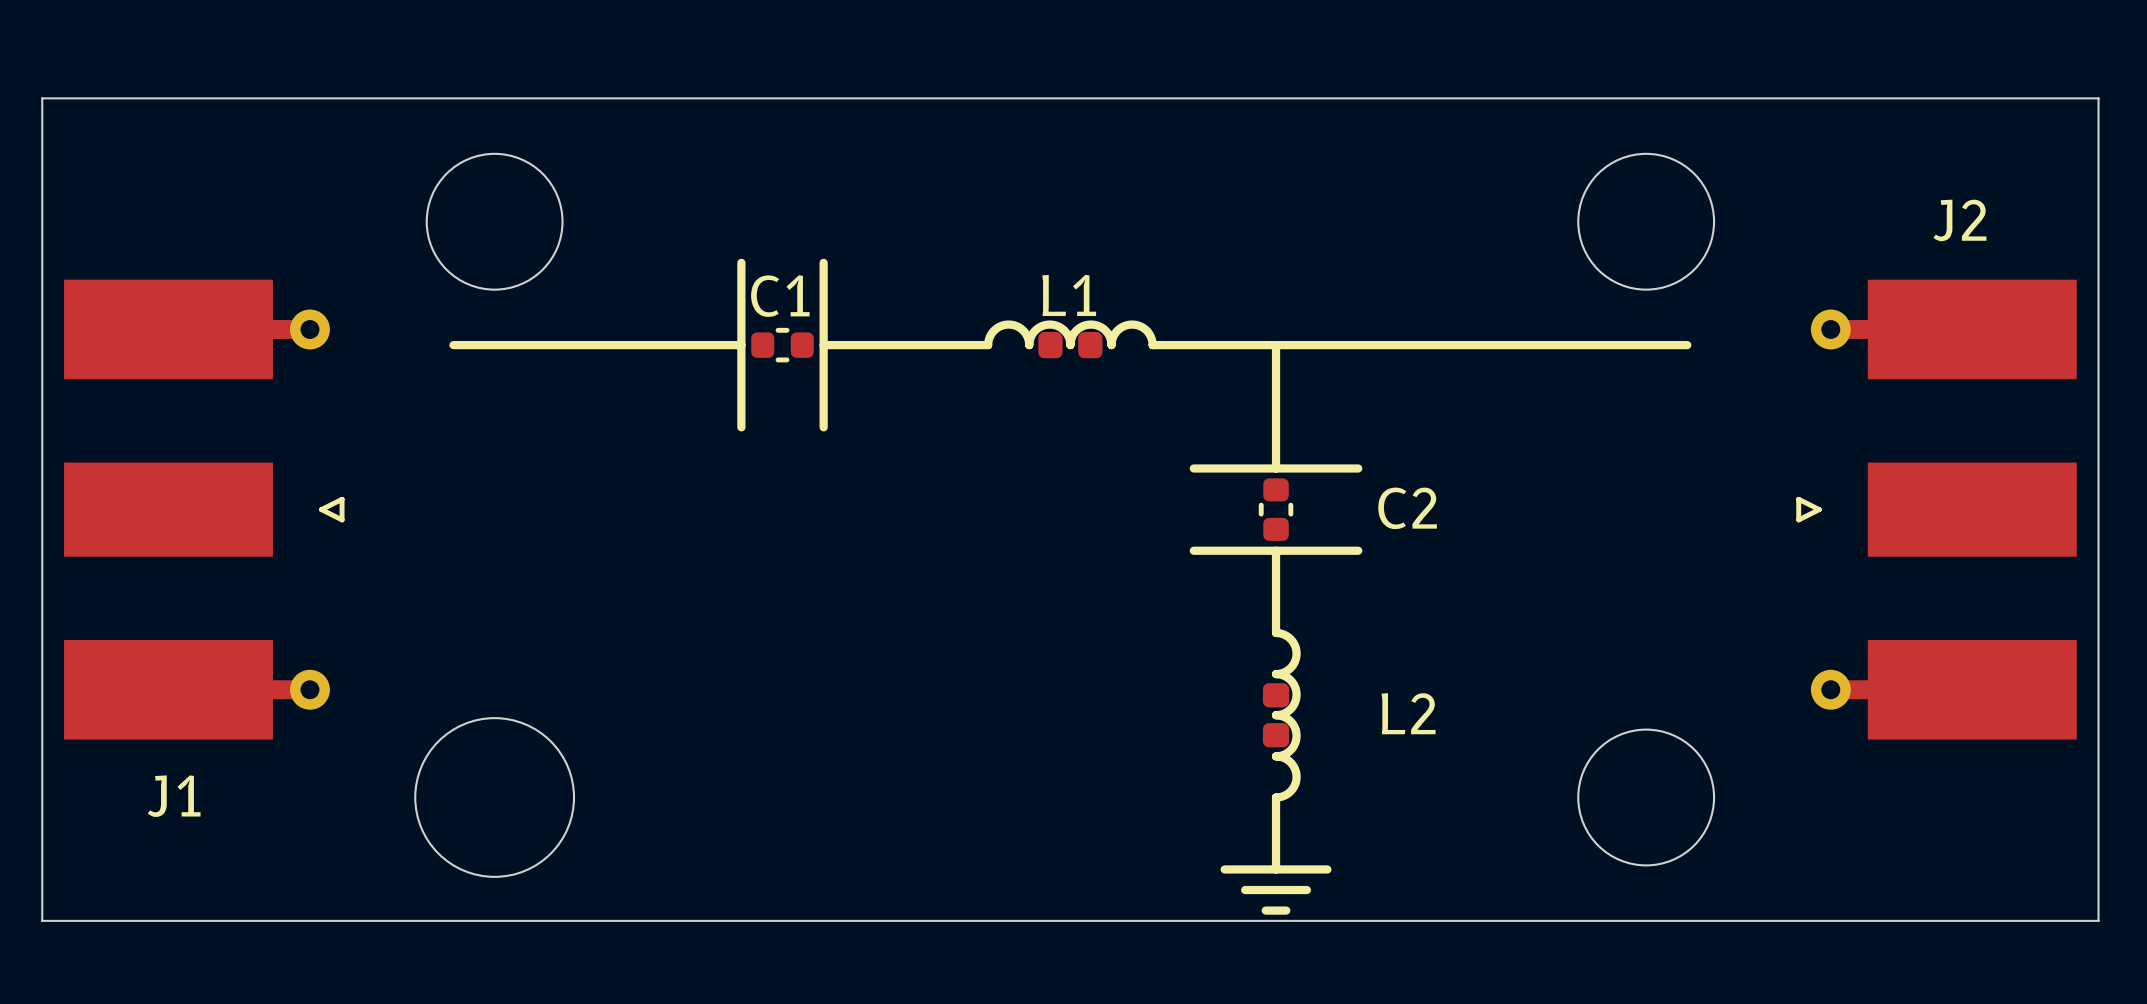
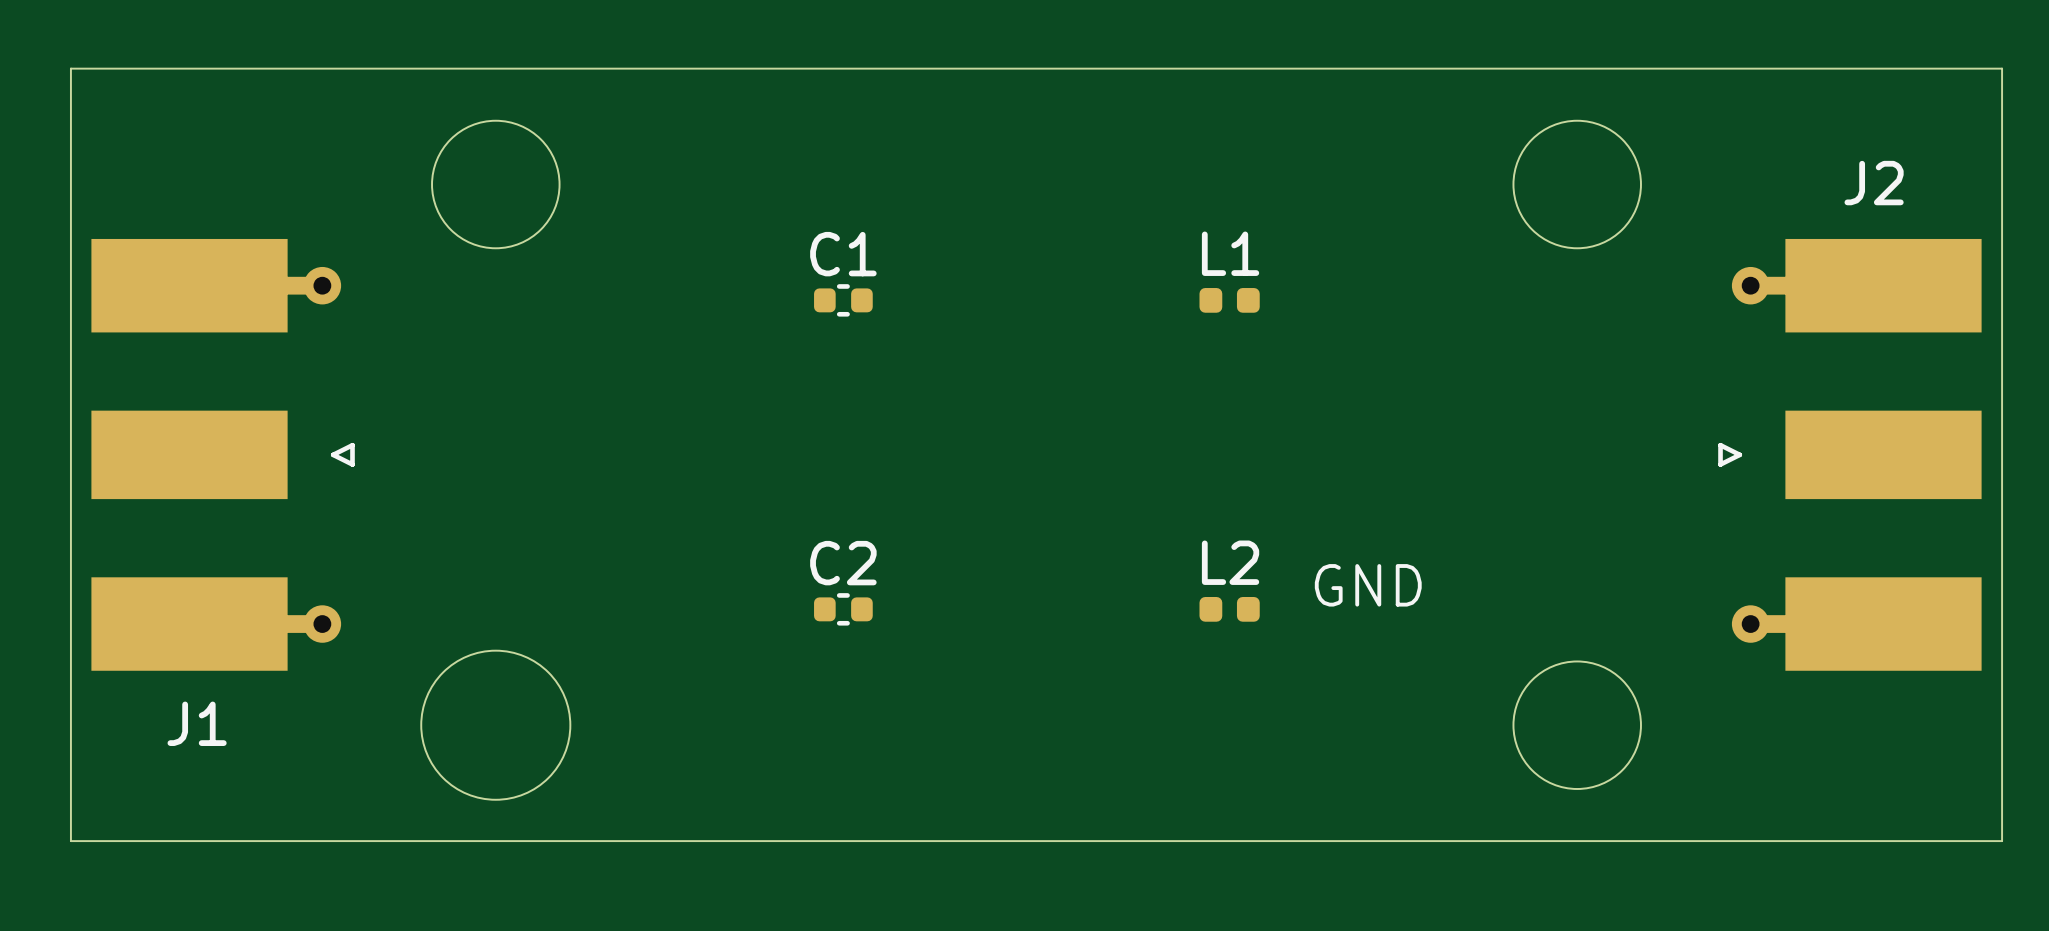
line: (741, 262) (741, 427) -> none
line: (823, 262) (823, 427) -> none
line: (453, 345) (741, 345) -> none
C1 position: (782, 345) -> (843, 300)
line: (823, 345) (988, 345) (989, 337) (994, 330) (1000, 326) (1008, 324) (1016, 326) (1023, 330) (1027, 337) (1029, 345) (1030, 337) (1035, 330) (1041, 326) (1049, 324) (1057, 326) (1064, 330) (1068, 337) (1070, 345) (1071, 337) (1076, 330) (1083, 326) (1090, 324) (1098, 326) (1105, 330) (1109, 337) (1111, 345) (1113, 337) (1117, 330) (1124, 326) (1132, 324) (1139, 326) (1146, 330) (1151, 337) (1152, 345) (1687, 345) -> none
L1 position: (1070, 345) -> (1229, 300)
line: (1276, 345) (1276, 468) -> none
line: (1193, 468) (1358, 468) -> none
C2 name position: C2 (1407, 508) -> C2 (843, 563)
C2 rotation: 0° (1276, 509) -> 90° clockwise (843, 609)
C2 position: (1276, 509) -> (843, 609)
line: (1193, 550) (1358, 550) -> none
line: (1276, 550) (1276, 632) (1283, 634) (1290, 639) (1295, 645) (1296, 653) (1295, 661) (1290, 668) (1283, 672) (1276, 674) (1283, 675) (1290, 680) (1295, 686) (1296, 694) (1295, 702) (1290, 709) (1283, 713) (1276, 715) (1283, 716) (1290, 721) (1295, 727) (1296, 735) (1295, 743) (1290, 750) (1283, 754) (1276, 756) (1283, 757) (1290, 762) (1295, 769) (1296, 776) (1295, 784) (1290, 791) (1283, 795) (1276, 797) (1276, 869) -> none
text: none -> GND (1368, 585)
L2 name position: L2 (1408, 713) -> L2 (1230, 562)
L2 rotation: 0° (1276, 715) -> 90° clockwise (1229, 609)
L2 position: (1276, 715) -> (1229, 609)
line: (1224, 869) (1327, 869) -> none
line: (1245, 890) (1306, 890) -> none
line: (1265, 910) (1286, 910) -> none

